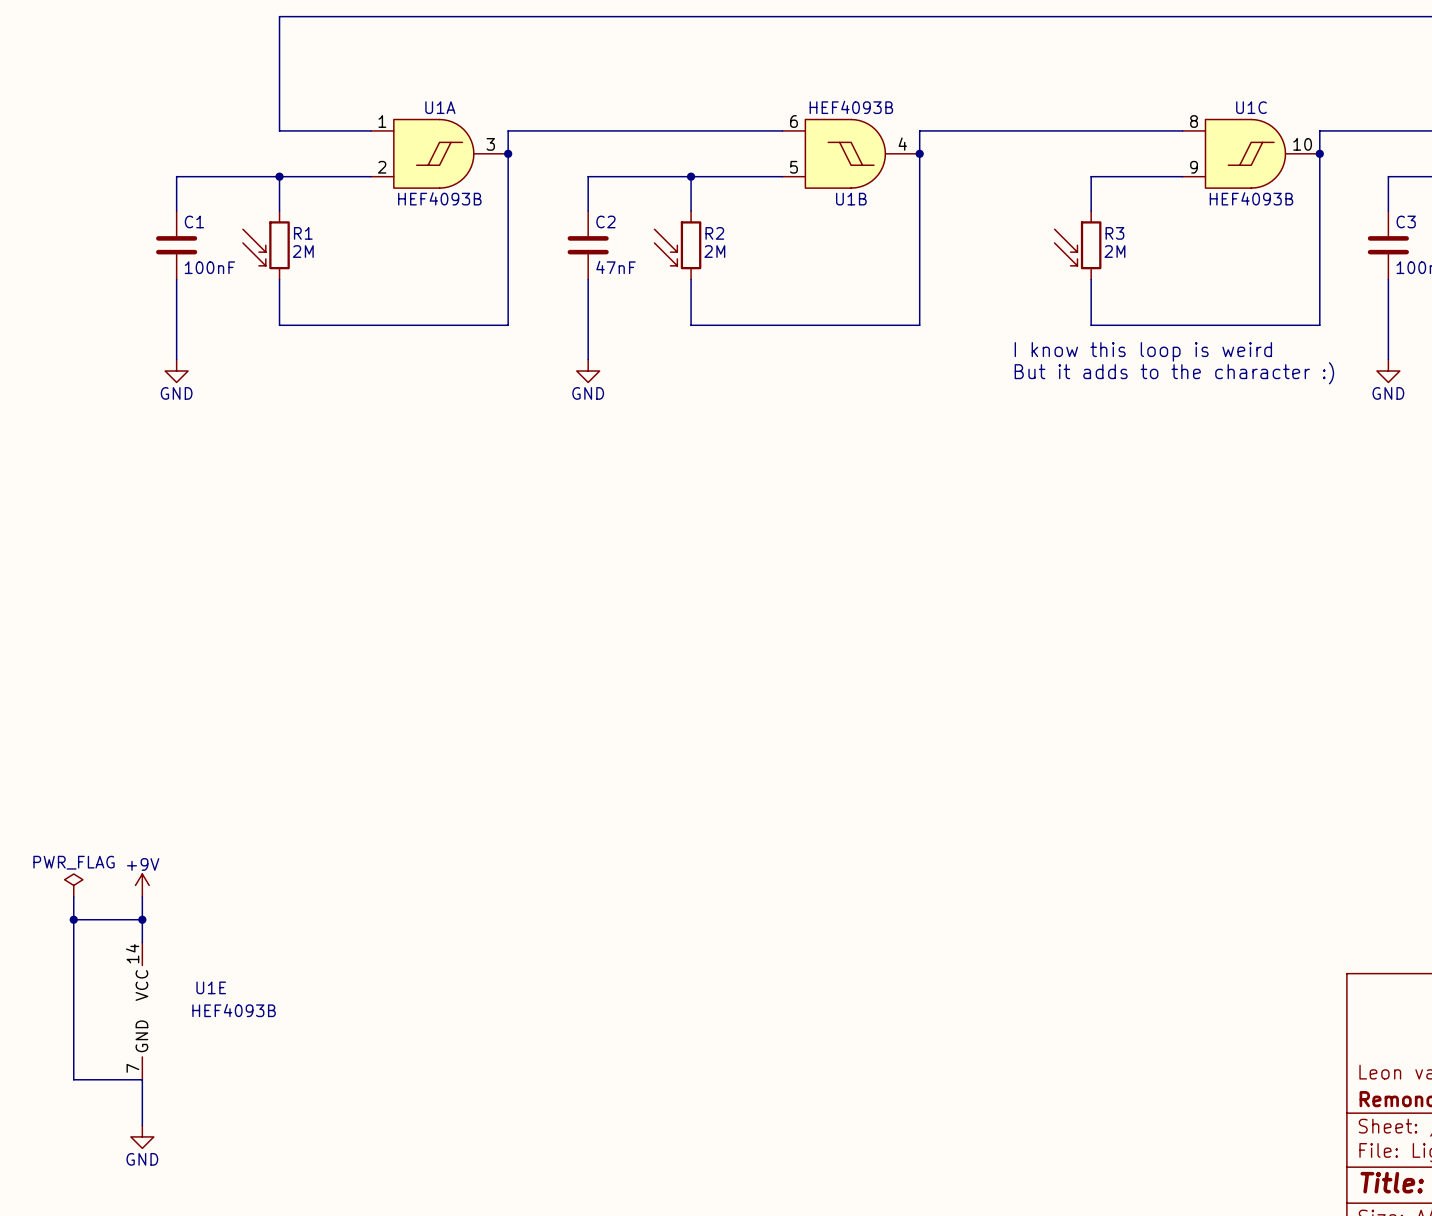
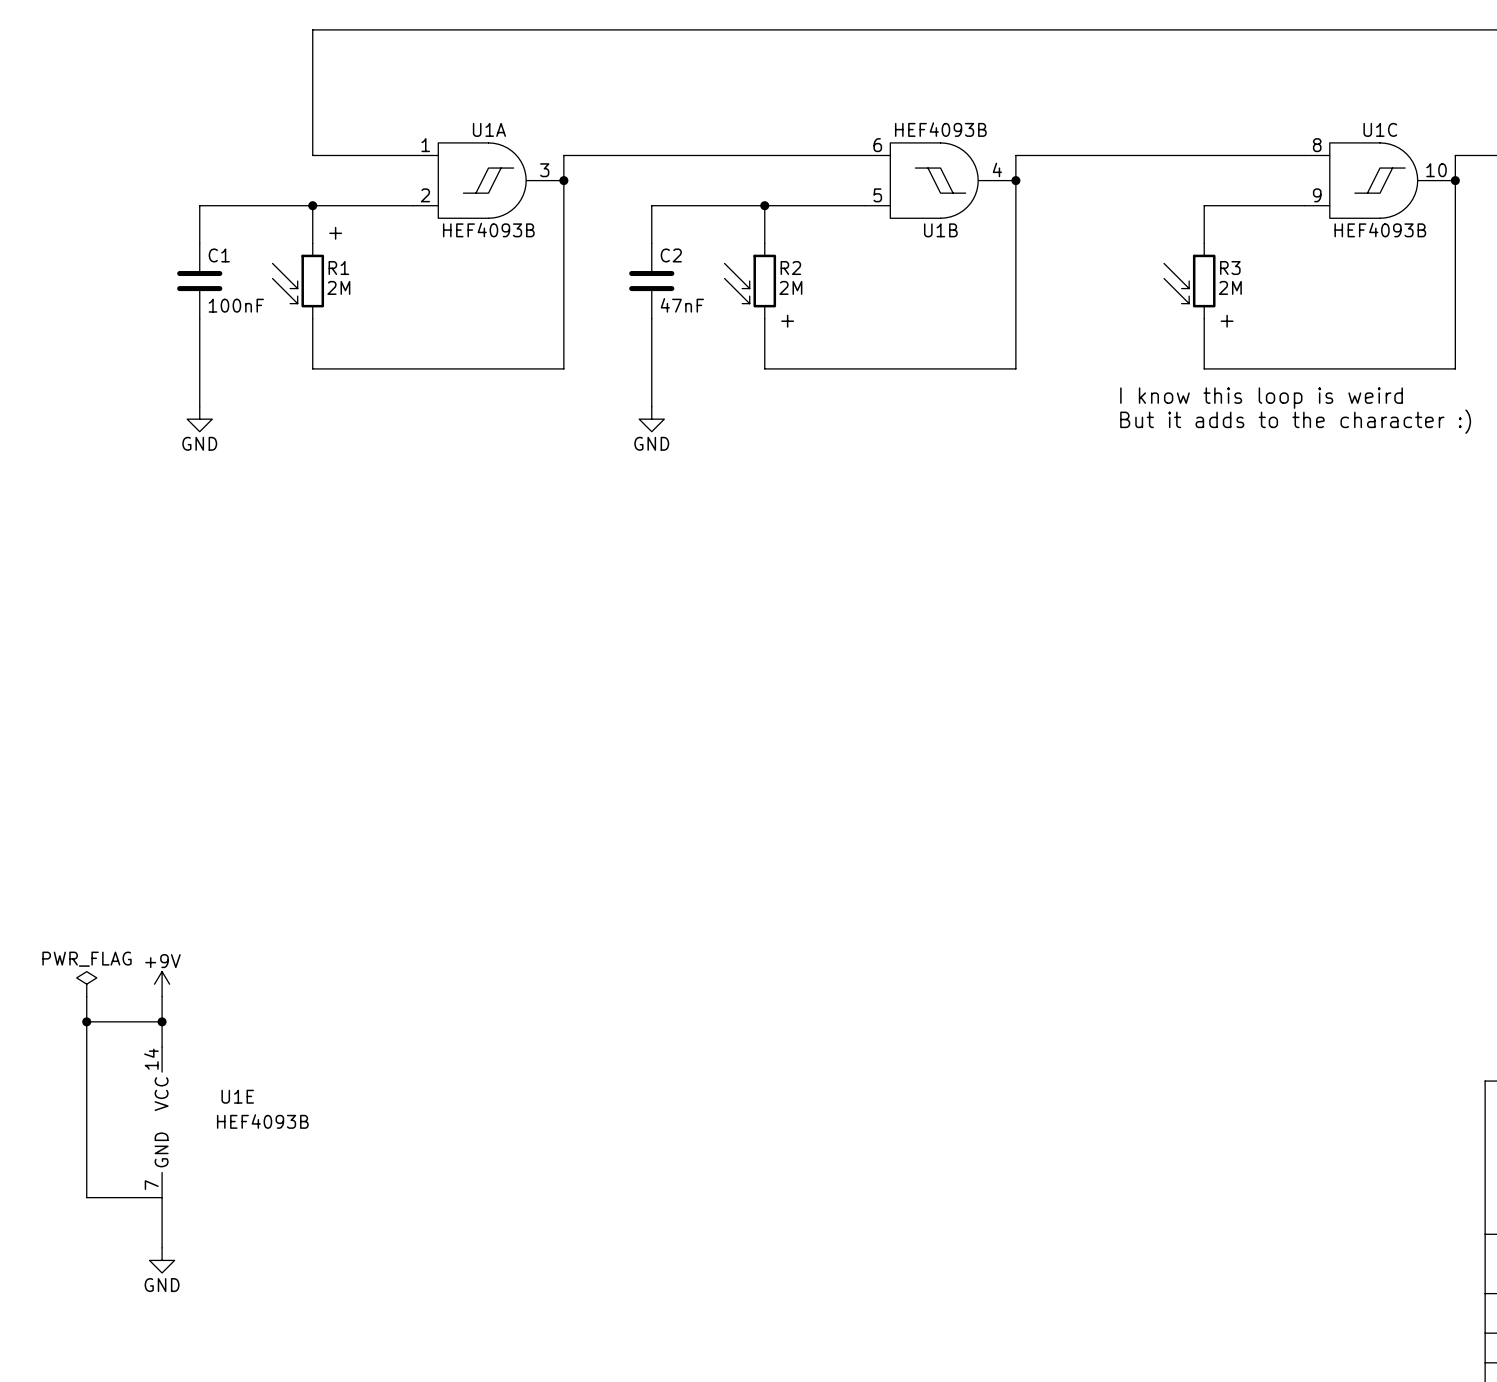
text: none -> + (335, 233)
text: none -> + (787, 321)
text: none -> + (1227, 321)

